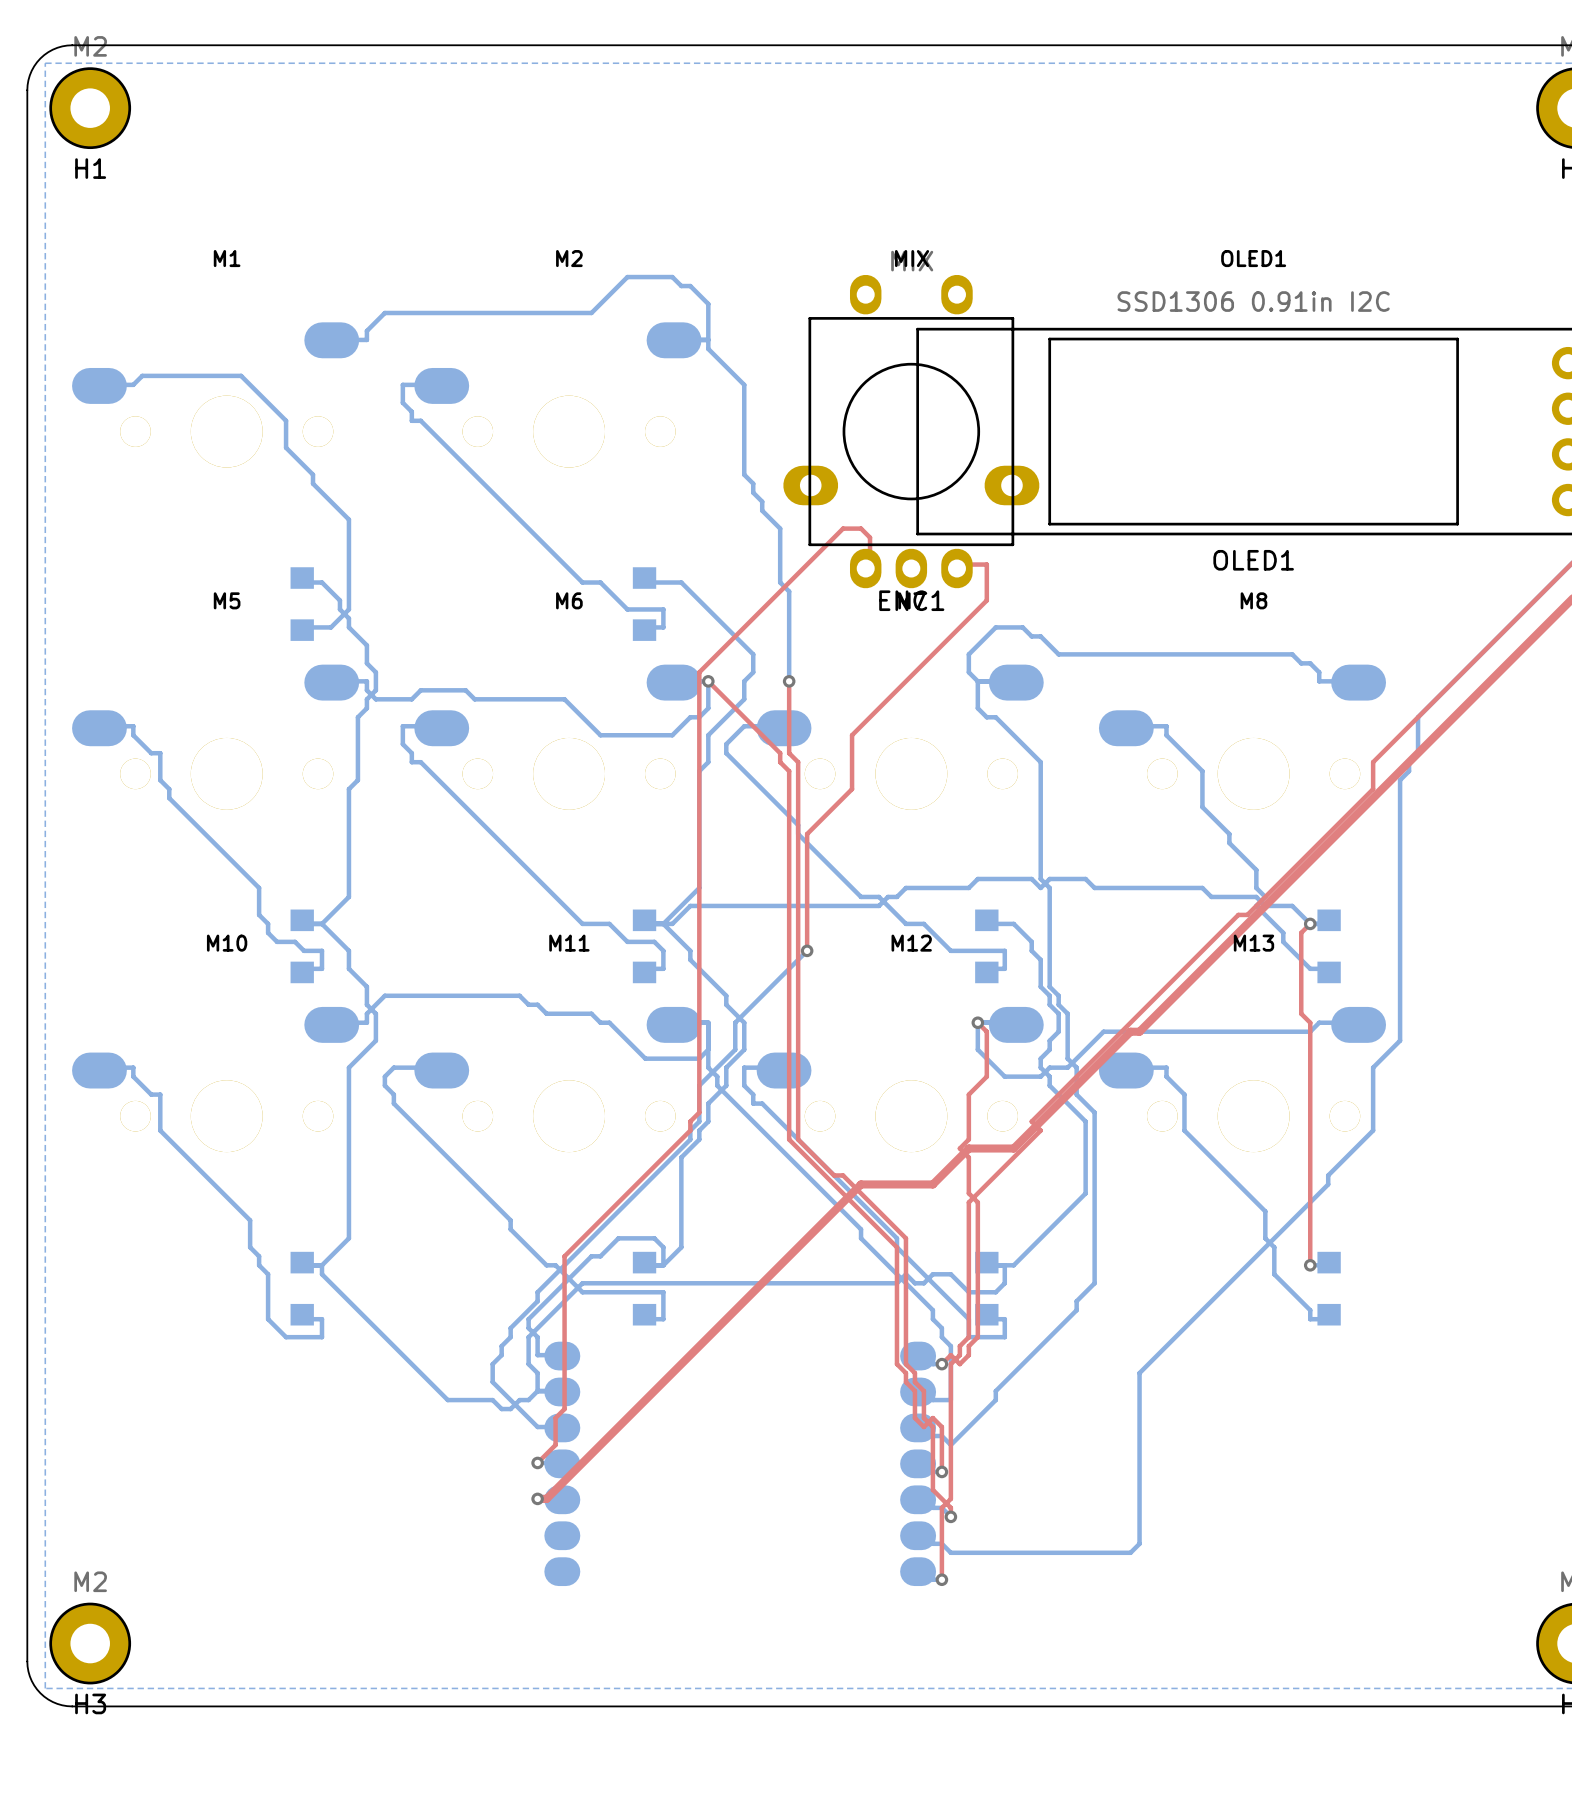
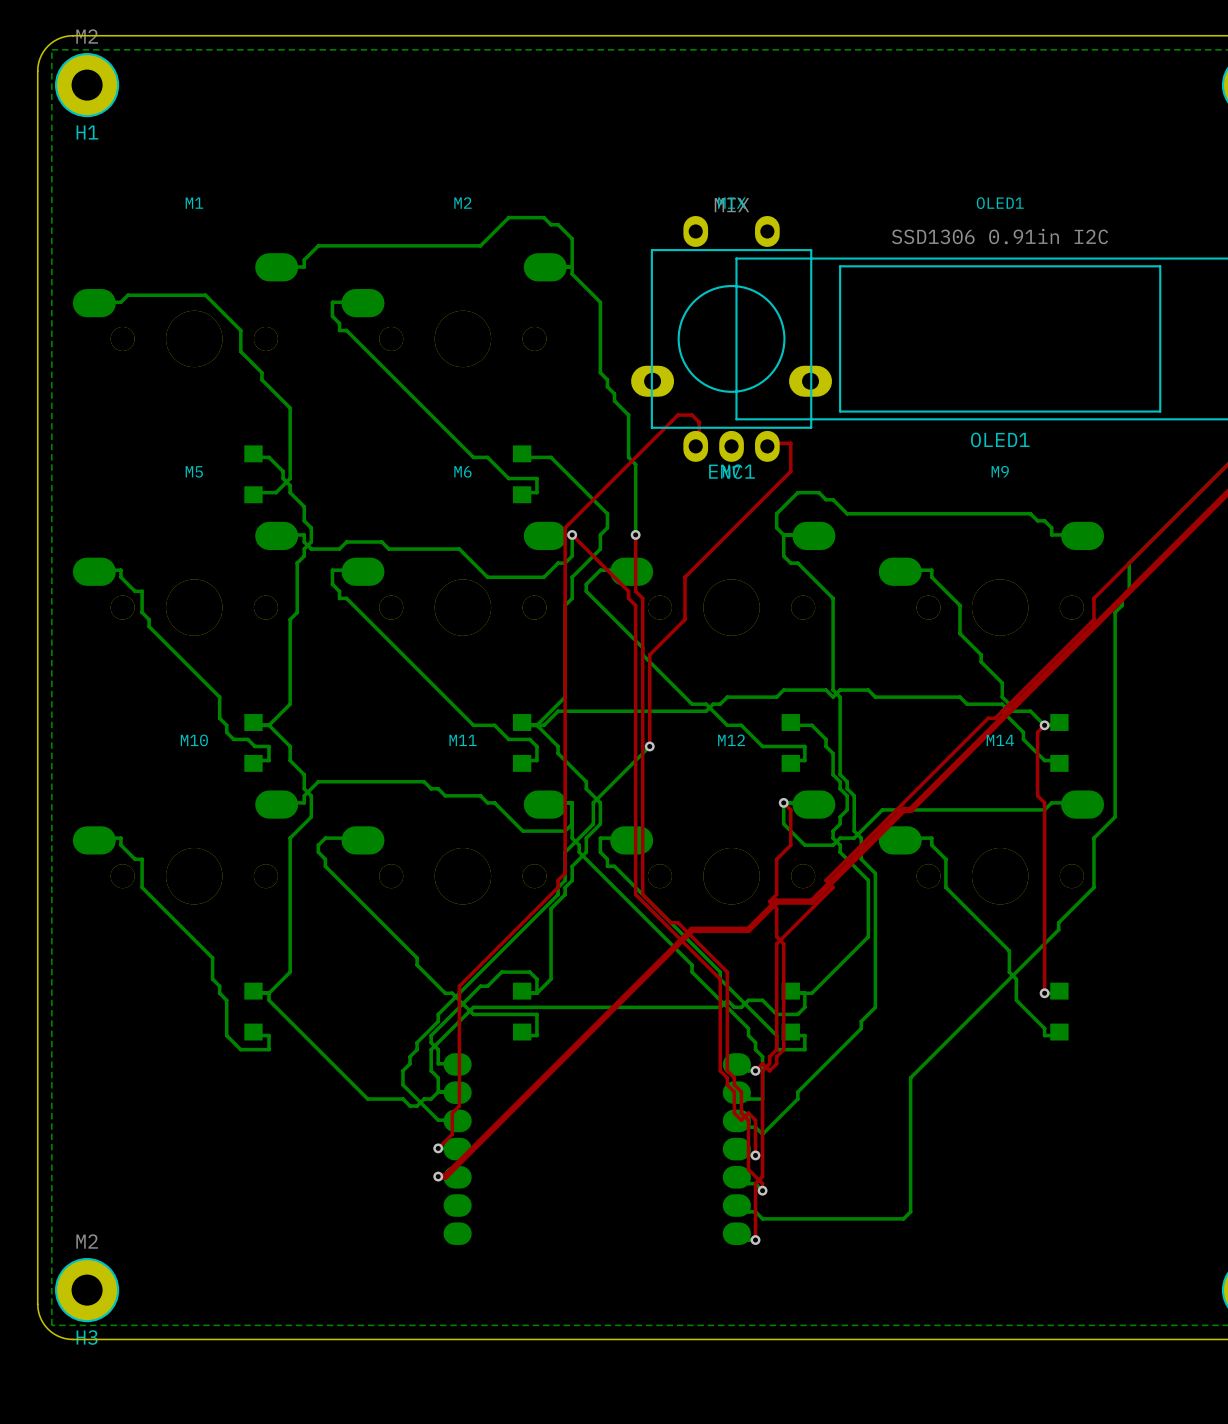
text: M8 (1253, 600) -> M9 (1000, 471)
text: M13 (1253, 943) -> M14 (1000, 740)

